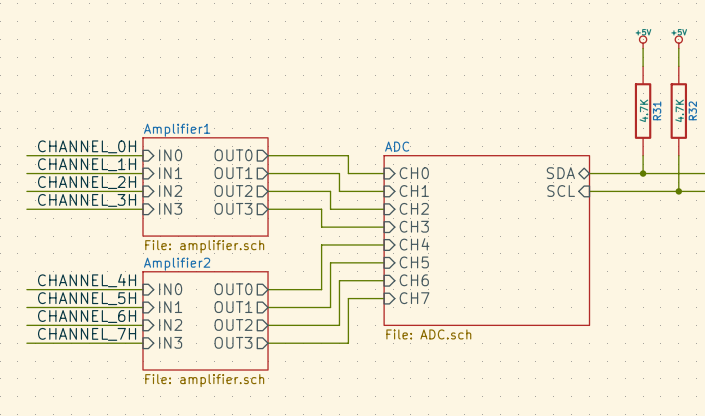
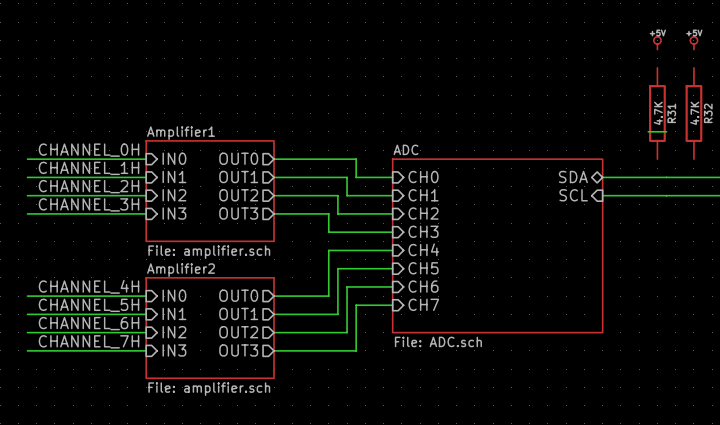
wire: (643, 48) (643, 66) -> none
wire: (678, 48) (678, 66) -> none
wire: none -> (648, 131) (666, 131)
wire: (643, 155) (643, 173) -> none
wire: (678, 155) (678, 191) -> none
junction: (643, 173) -> none
junction: (678, 191) -> none

